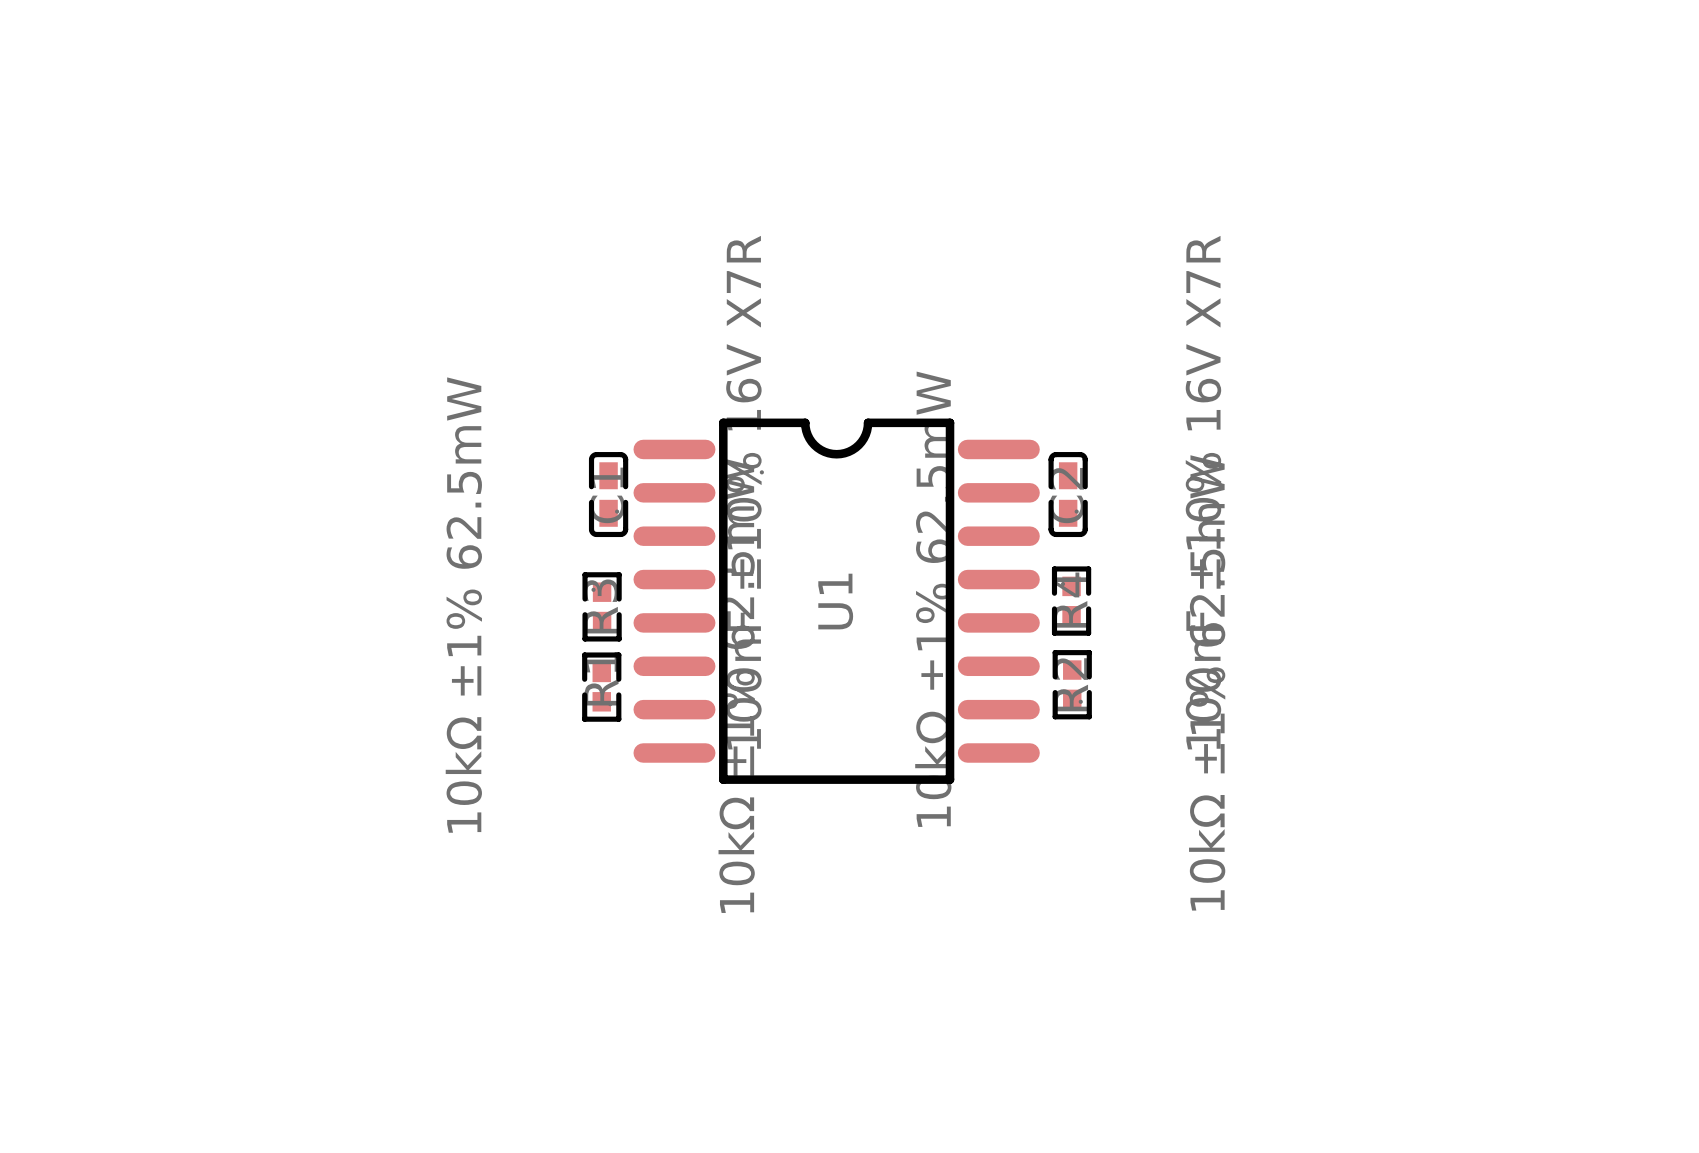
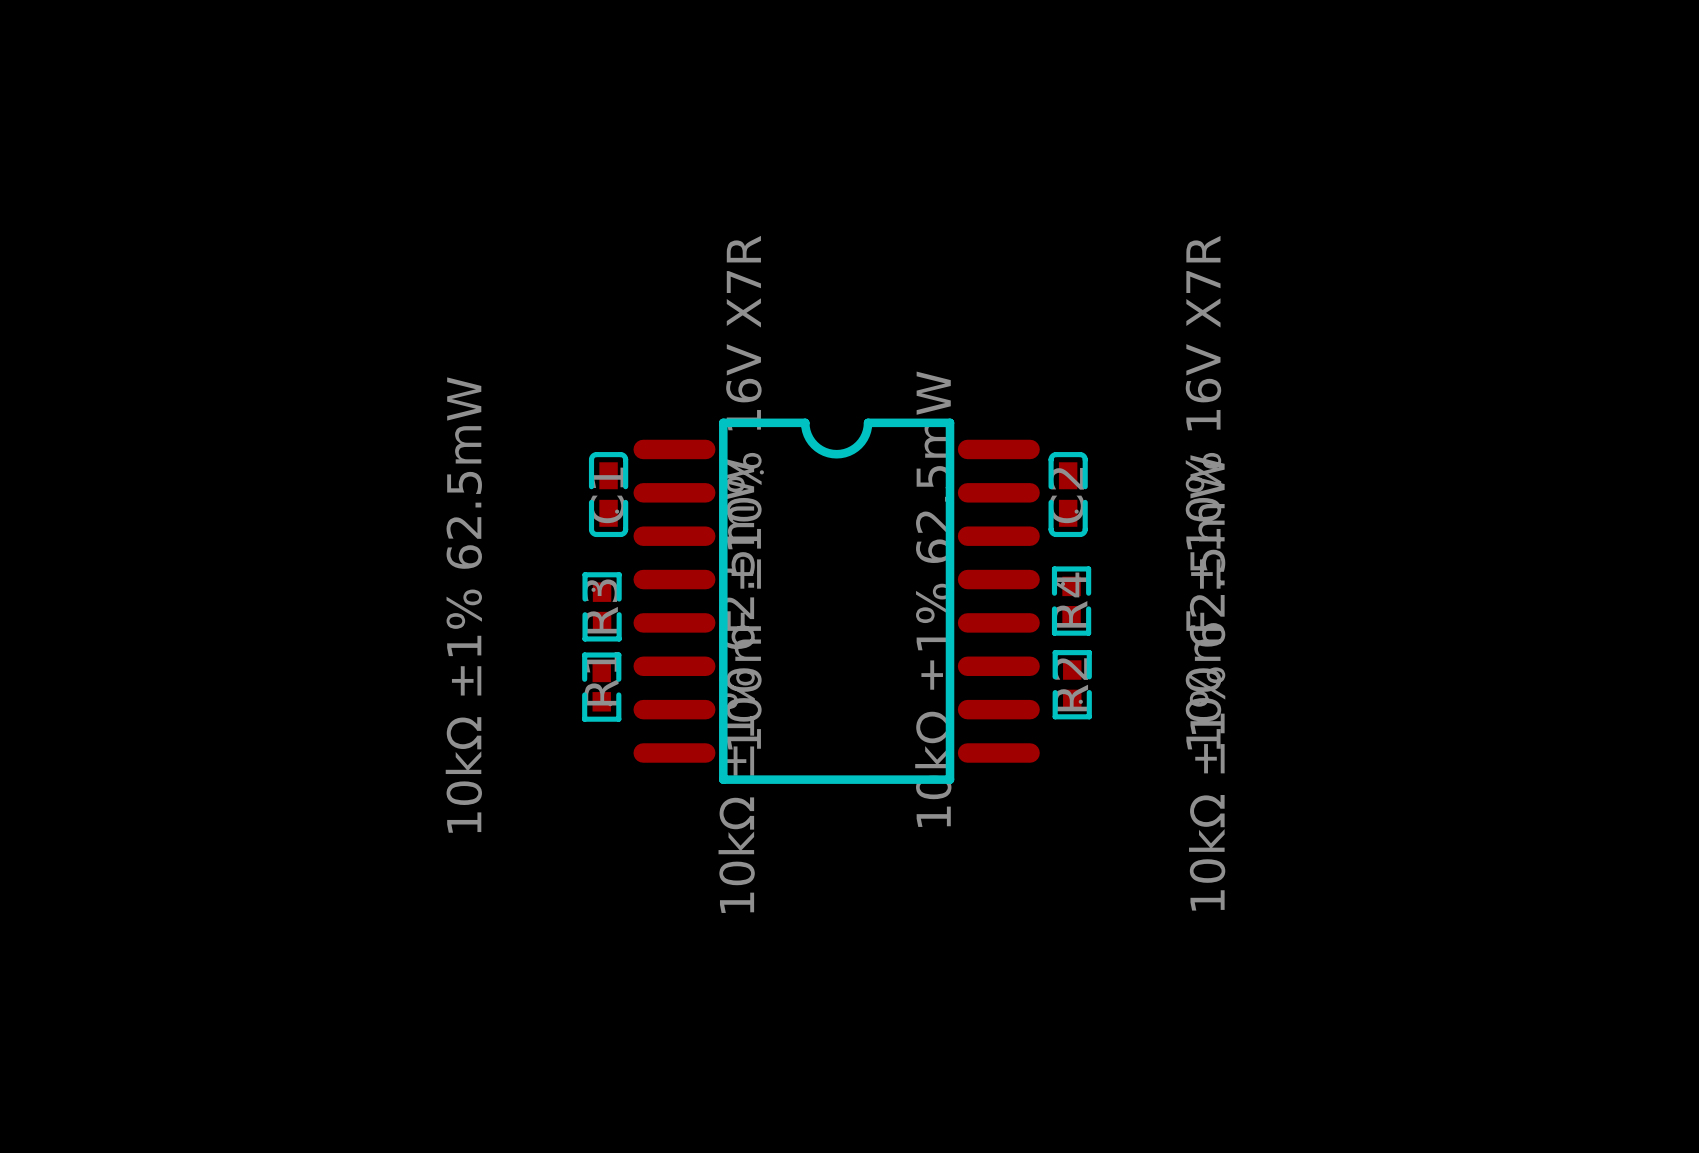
U1 name: U1 (835, 601) -> none

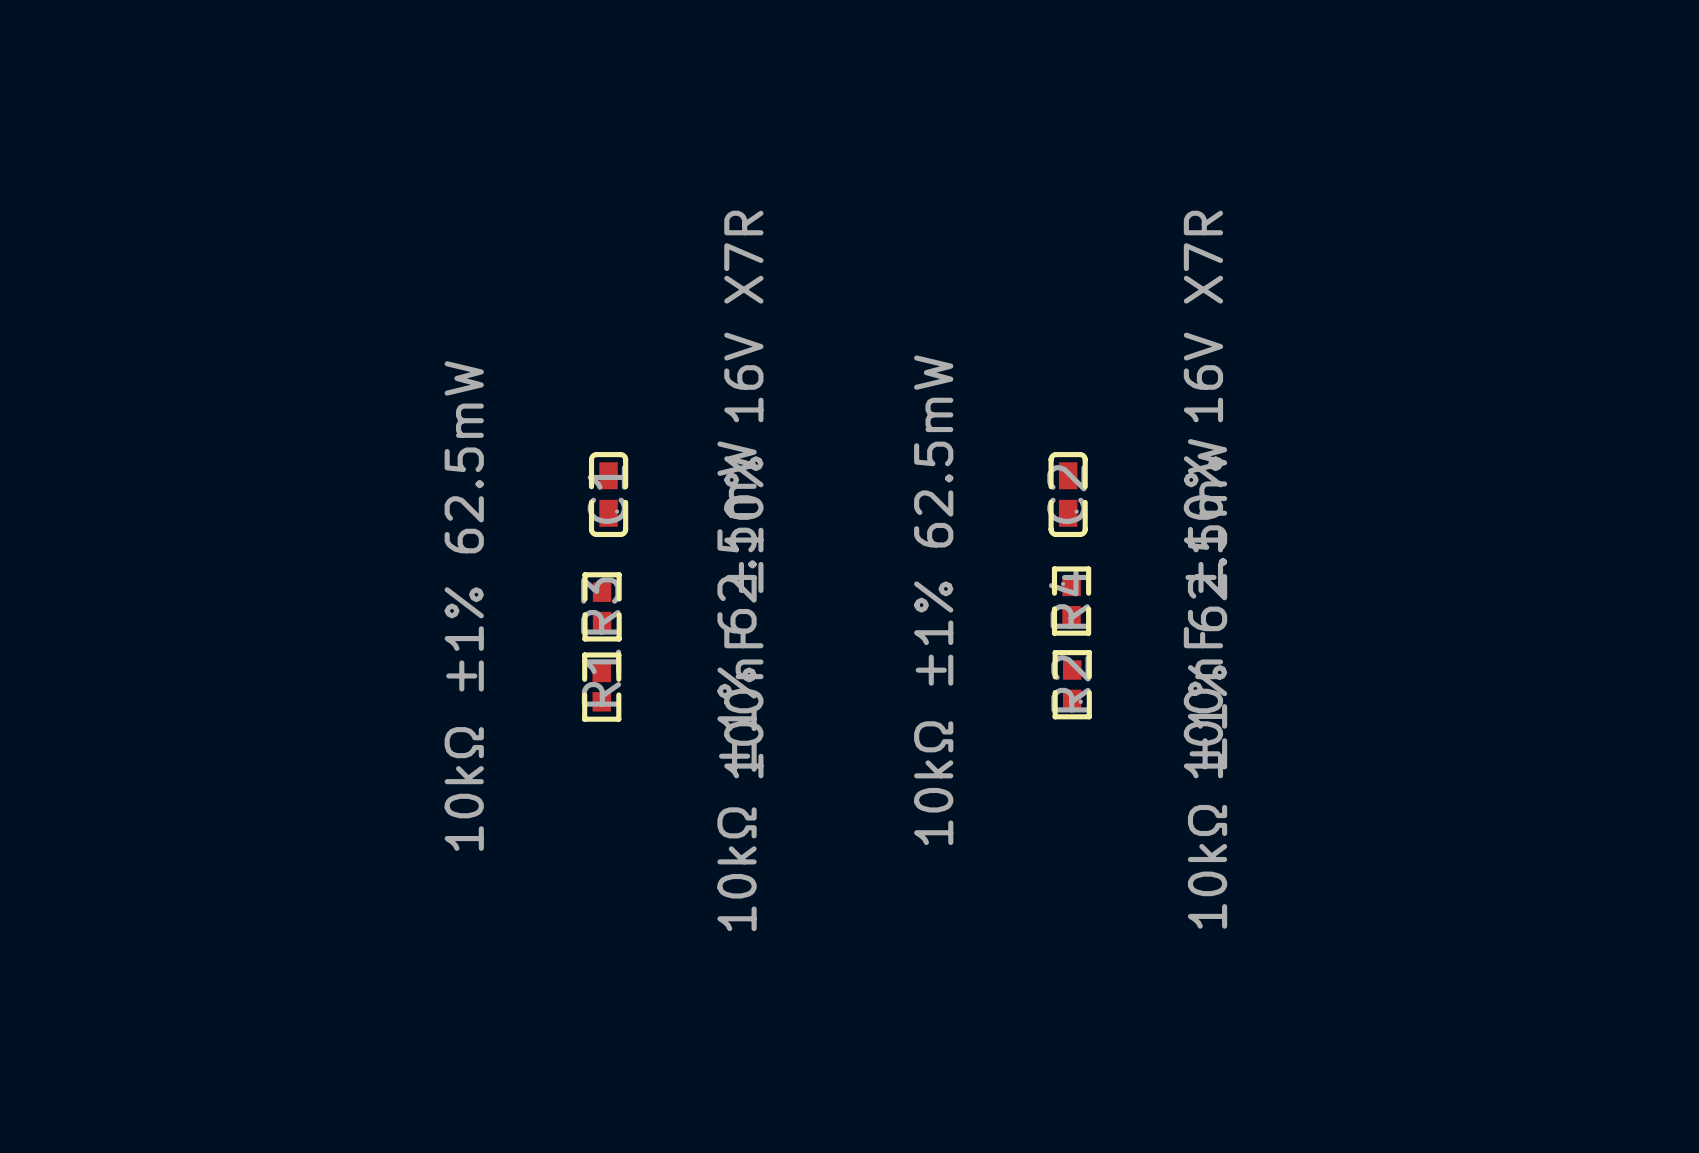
part: (836, 601) -> none

